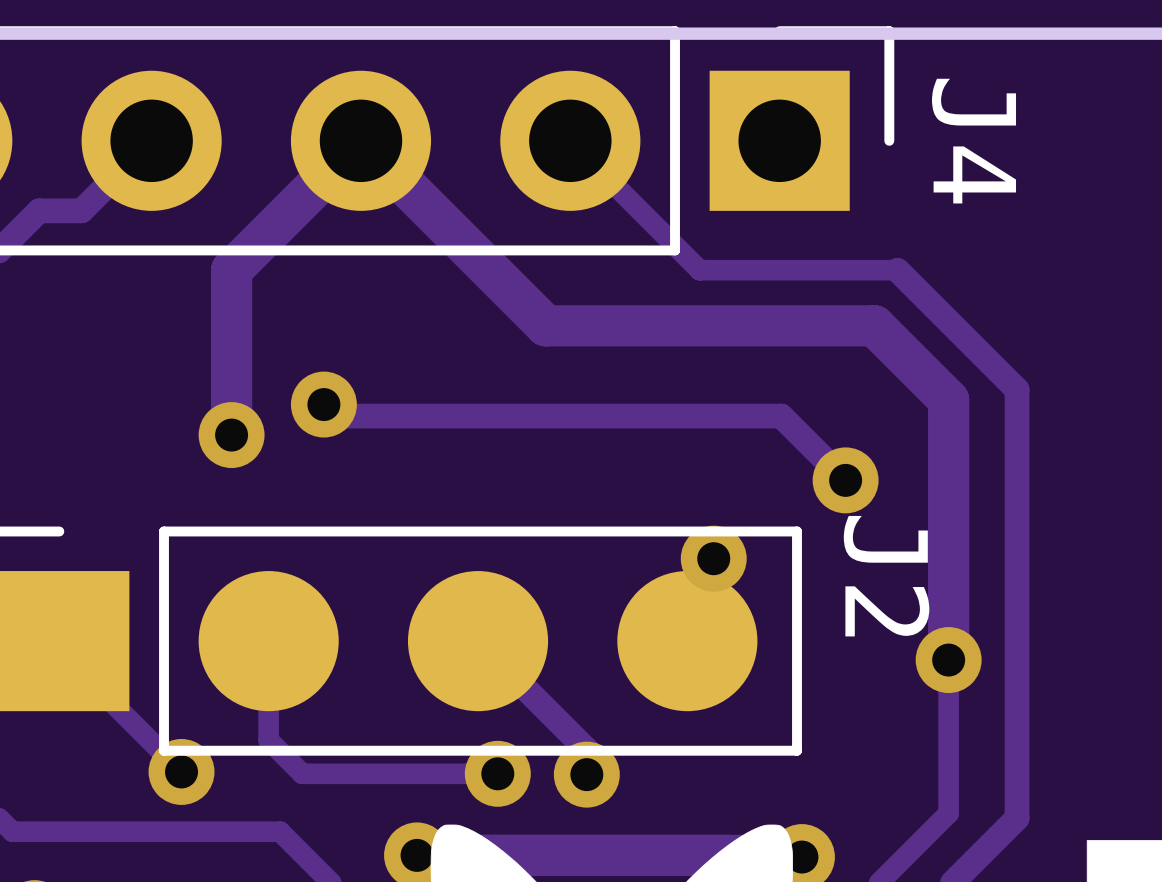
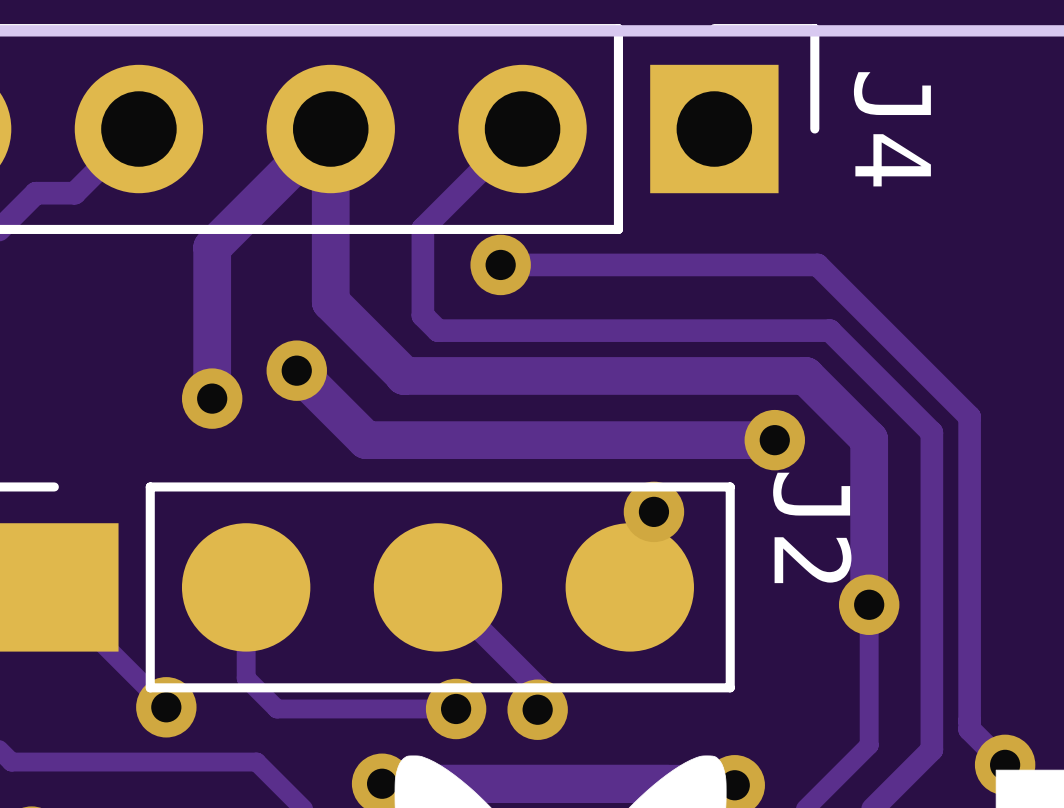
track: (360, 140) (546, 325) (874, 325) (948, 399) (948, 479) -> (404, 375) (805, 375) (869, 439)
track: none -> (330, 129) (330, 301) (404, 375)
track: (570, 140) (699, 270) (897, 270) (1017, 389) (1017, 472) -> (522, 129) (422, 228) (422, 315) (437, 330) (829, 330) (931, 432)
track: none -> (500, 264) (817, 264) (969, 416) (969, 729) (1005, 764)
via: none -> (500, 264)
track: (335, 416) (781, 416) (845, 480) -> (296, 370) (366, 440) (774, 440)
via: none -> (1005, 764)

